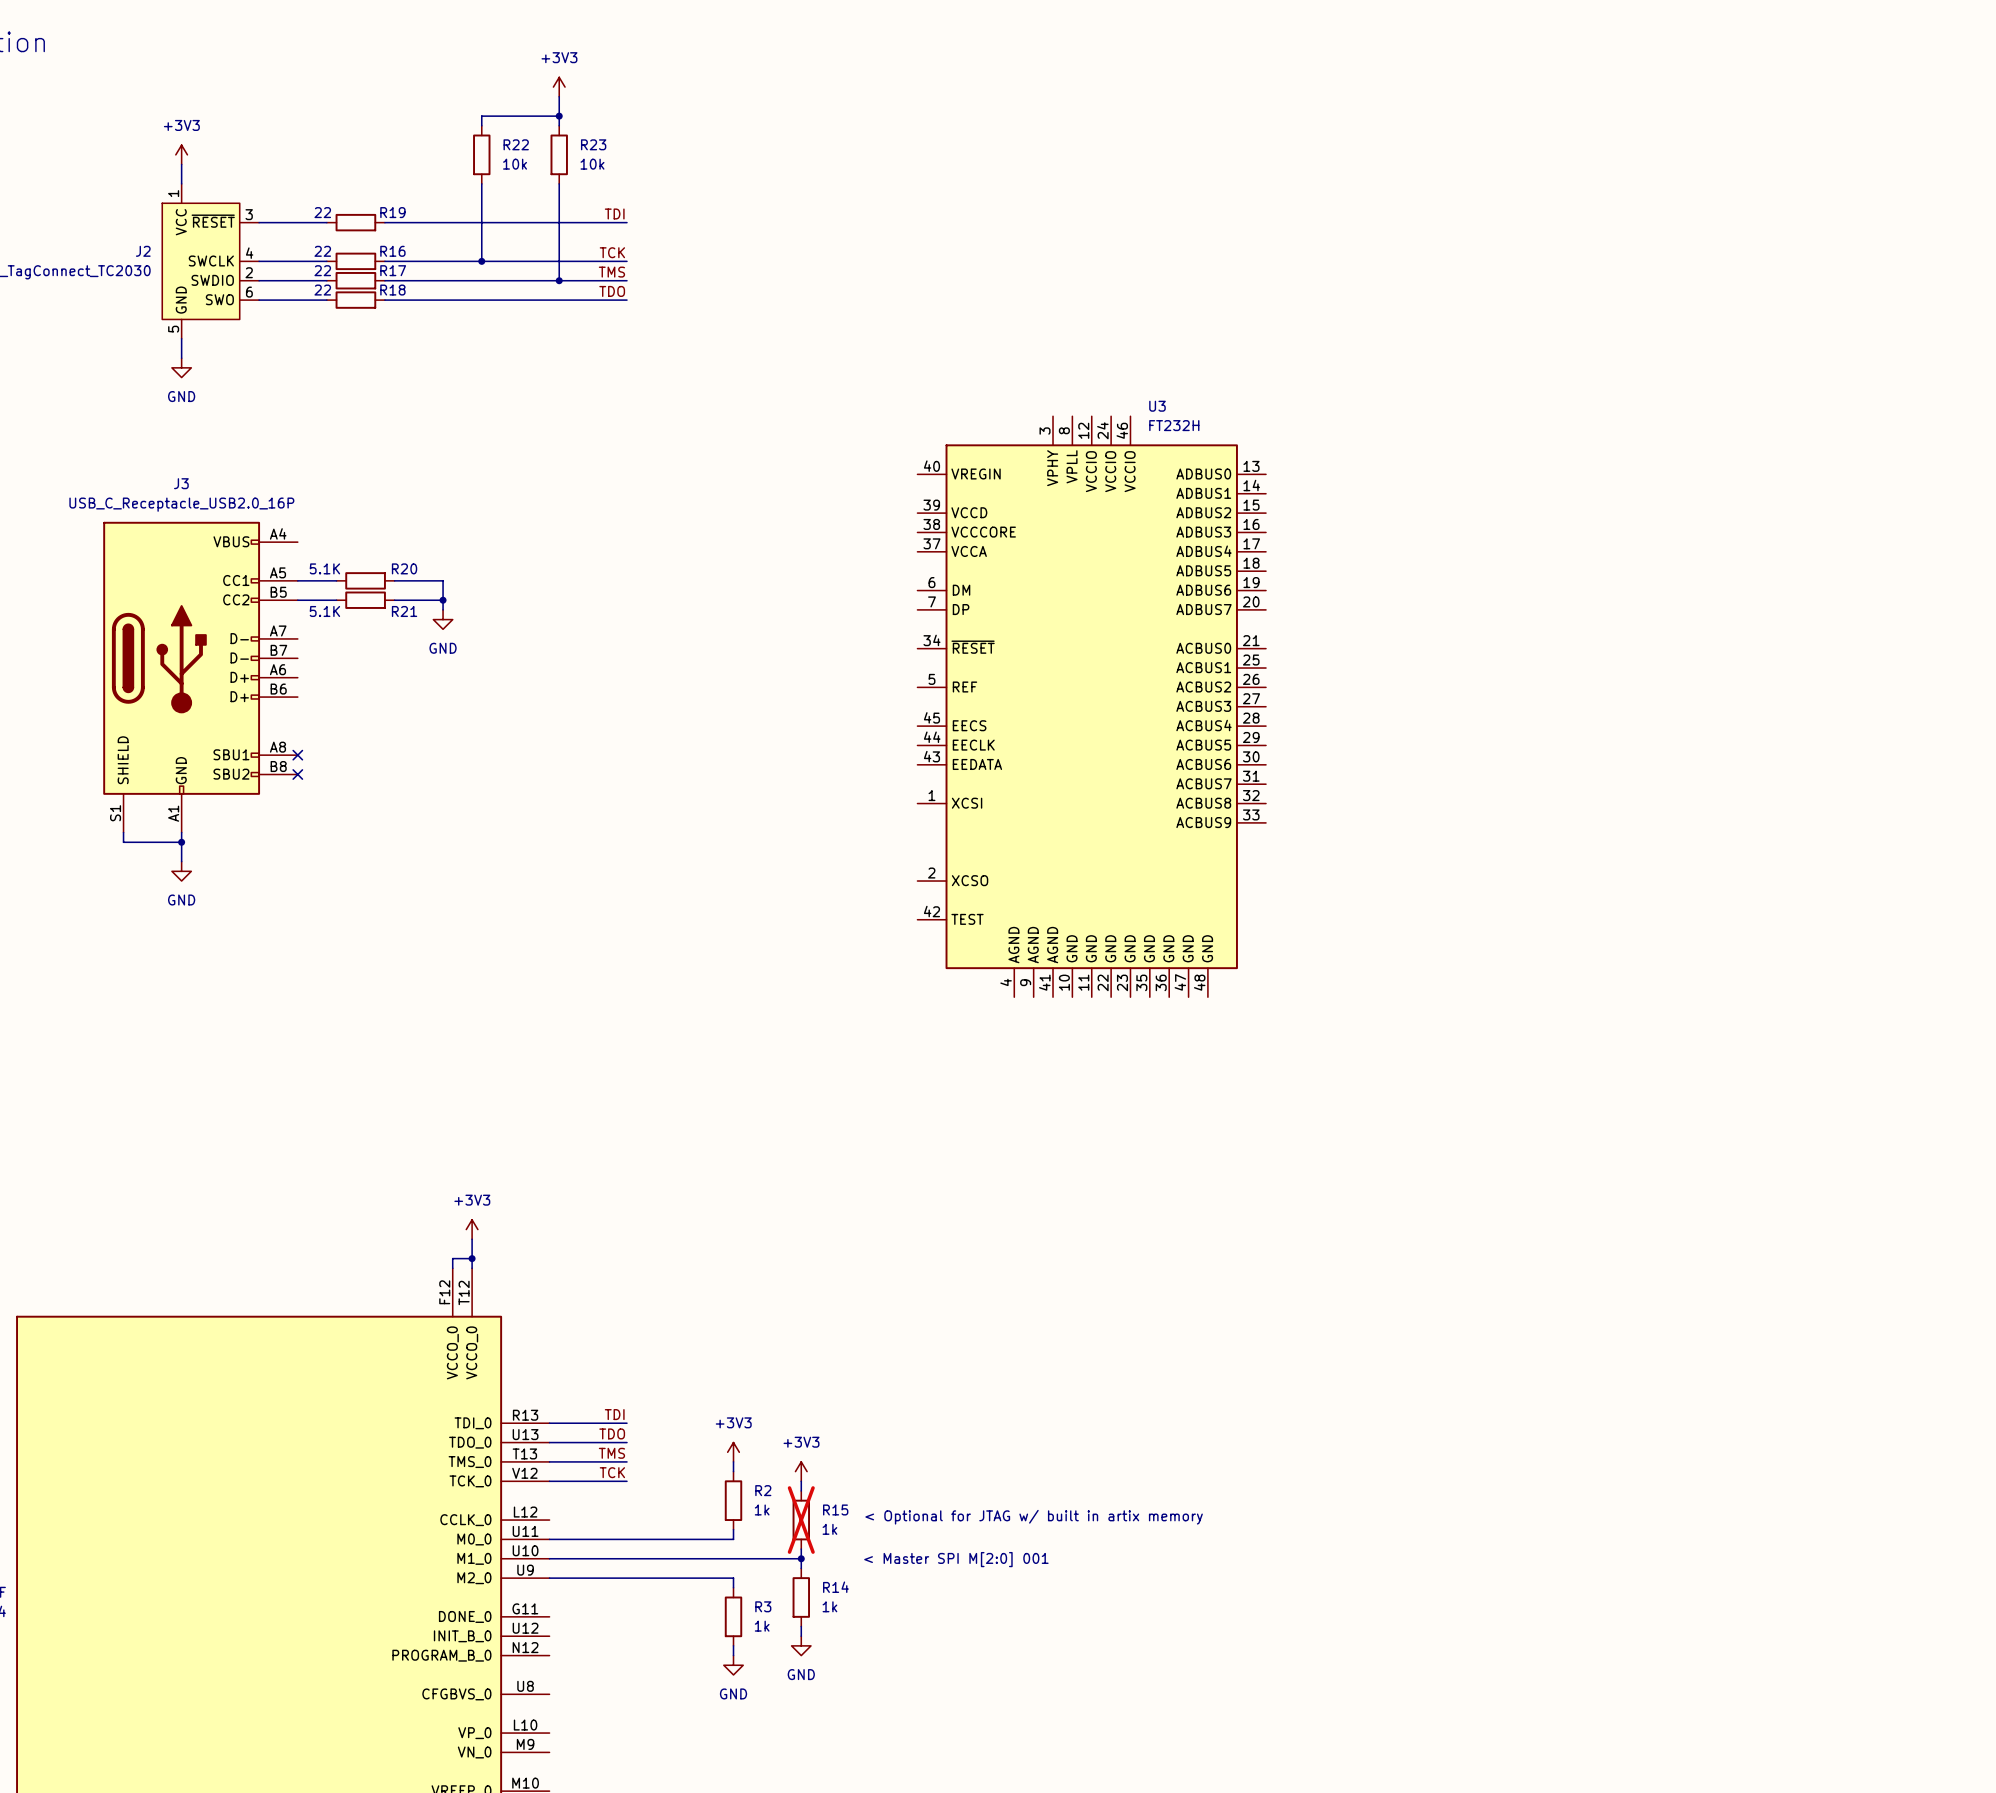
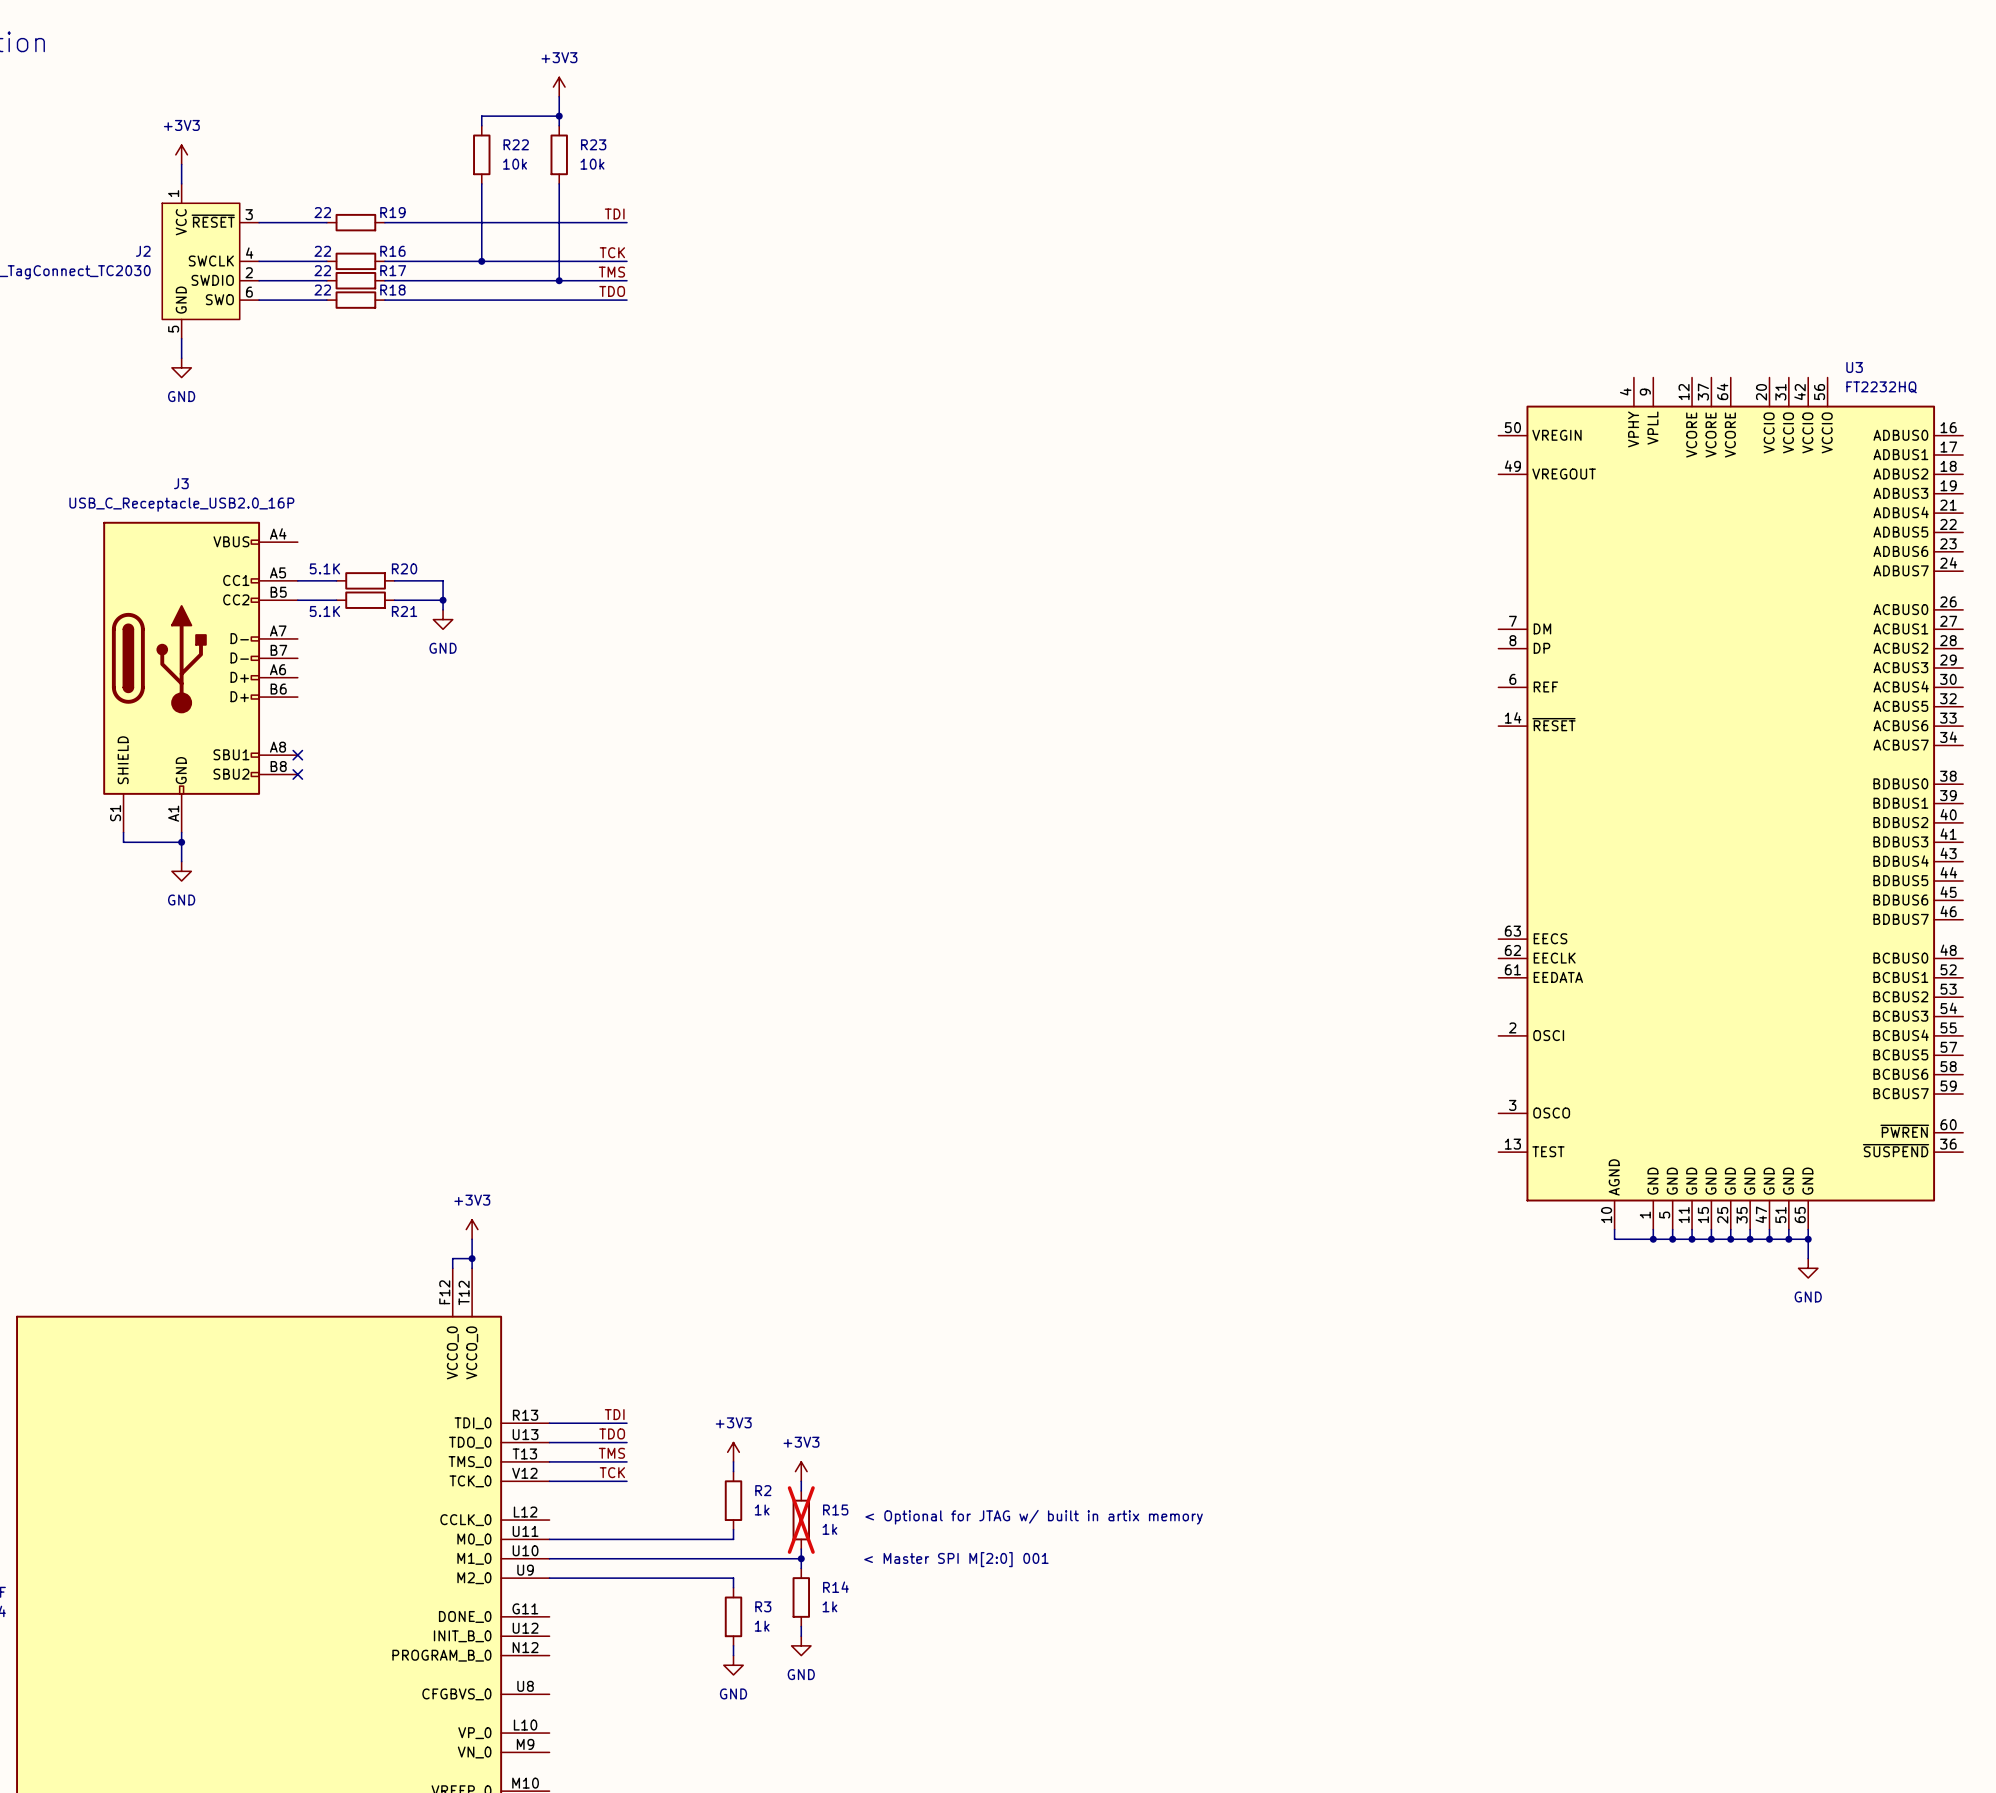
U3 name position: U3 (1157, 406) -> U3 (1854, 367)
U3 symbol: [917, 416, 1267, 998] -> [1498, 377, 1964, 1230]
U3 value: FT232H (1174, 425) -> FT2232HQ (1881, 387)
wire: none -> (1614, 1229) (1614, 1239) (1808, 1239)
wire: none -> (1653, 1229) (1653, 1239)
wire: none -> (1672, 1229) (1672, 1239)
wire: none -> (1692, 1229) (1692, 1239)
wire: none -> (1711, 1229) (1711, 1239)
wire: none -> (1730, 1229) (1730, 1239)
wire: none -> (1750, 1229) (1750, 1239)
wire: none -> (1769, 1229) (1769, 1239)
wire: none -> (1788, 1229) (1788, 1239)
wire: none -> (1808, 1229) (1808, 1258)
junction: none -> (1653, 1239)
junction: none -> (1672, 1239)
junction: none -> (1692, 1239)
junction: none -> (1711, 1239)
junction: none -> (1730, 1239)
junction: none -> (1750, 1239)
junction: none -> (1769, 1239)
junction: none -> (1788, 1239)
junction: none -> (1808, 1239)
power symbol: none -> GND (1808, 1268)

